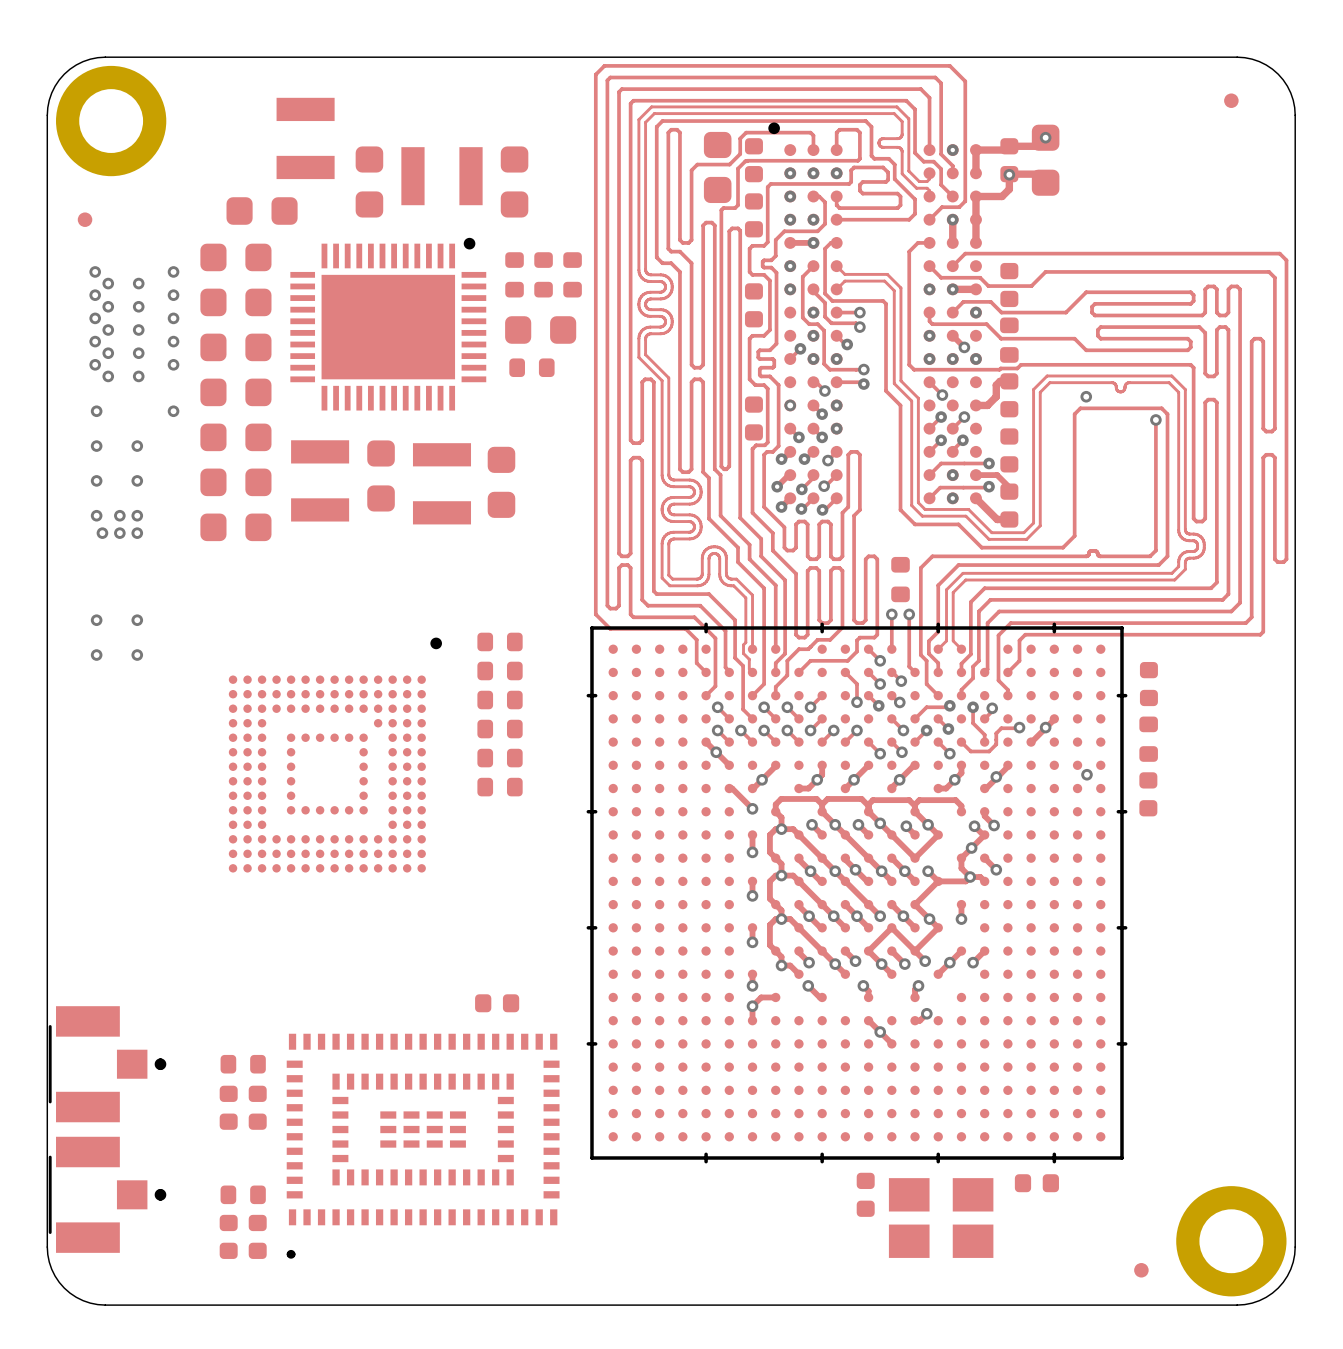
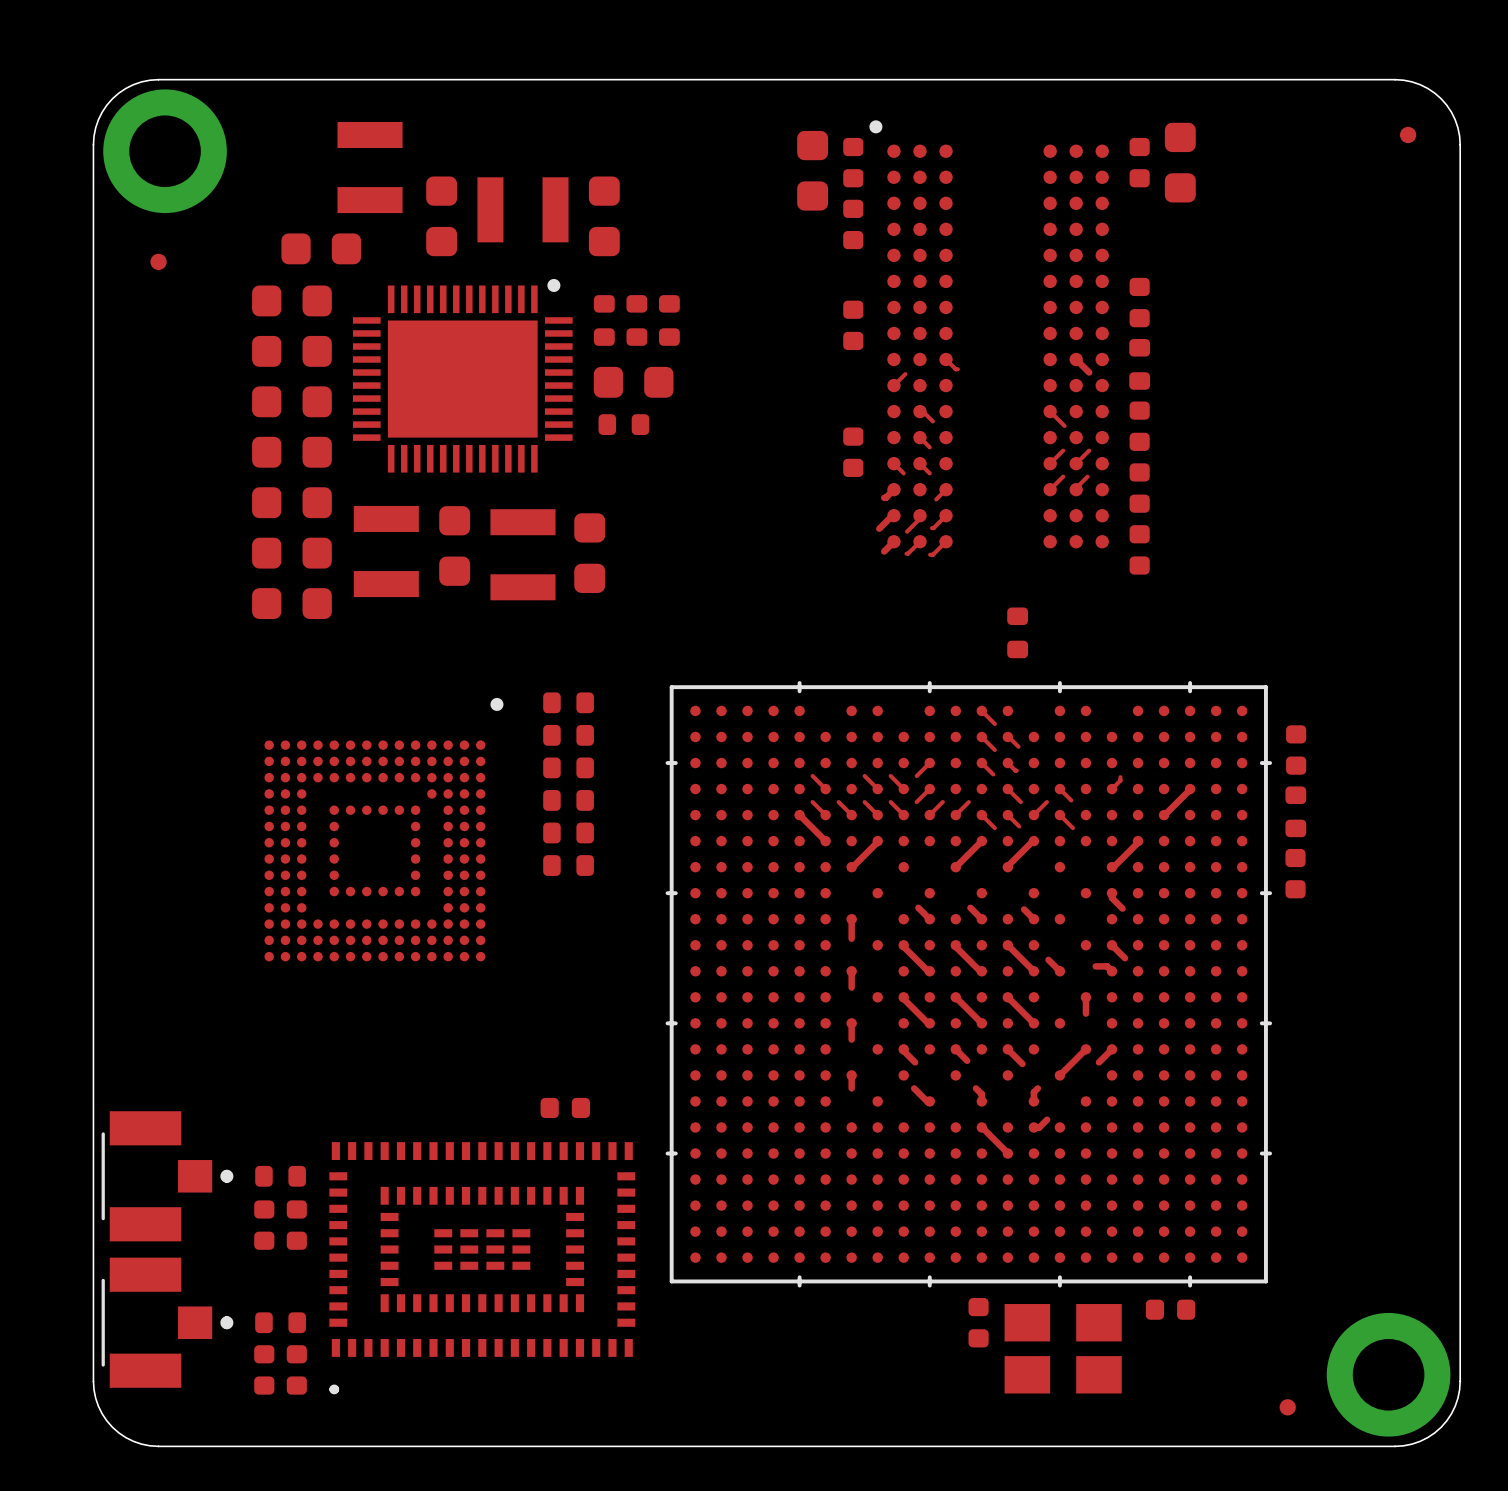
part position: (1231, 100) -> (1408, 134)
part position: (111, 121) -> (165, 151)
track: (1045, 137) (1037, 146) (1009, 146) (1005, 150) (975, 150) (975, 173) -> none
via: (1045, 137) -> none
part position: (305, 138) -> (370, 167)
board edge: (1295, 144) (1294, 107) (1287, 86) (1278, 74) (1266, 64) (1252, 59) (1237, 57) (105, 57) (83, 61) (64, 74) (51, 93) (47, 115) (47, 1247) (49, 1262) (55, 1276) (64, 1288) (76, 1297) (97, 1304) (134, 1305) -> (1460, 144) (1455, 119) (1441, 98) (1420, 84) (1395, 79) (158, 79) (133, 84) (112, 98) (98, 119) (93, 144) (93, 1381) (98, 1406) (112, 1427) (133, 1441) (158, 1446)
track: (813, 150) (813, 135) (810, 132) (746, 132) (740, 138) (740, 154) (729, 164) (697, 164) (691, 170) (691, 240) (688, 242) (682, 242) (679, 240) (679, 132) (677, 129) (671, 129) (668, 132) (668, 248) (671, 251) (679, 251) (691, 263) (691, 364) (694, 367) (700, 367) (703, 364) (703, 225) (706, 222) (711, 222) (714, 225) (714, 469) (720, 475) (720, 515) (749, 544) (749, 559) (775, 585) (775, 649) -> none
track: (836, 150) (836, 132) (839, 129) (856, 129) (859, 132) (859, 158) (857, 160) (745, 161) (738, 168) (738, 205) (735, 208) (723, 208) (721, 210) (721, 466) (726, 469) (729, 466) (729, 231) (732, 228) (738, 228) (740, 230) (740, 517) (761, 538) (761, 556) (785, 580) (785, 653) (775, 663) (775, 672) -> none
track: (929, 150) (929, 97) (920, 89) (621, 89) (619, 92) (619, 553) (621, 556) (627, 556) (630, 553) (630, 460) (633, 457) (639, 457) (642, 460) (642, 599) (648, 605) (700, 605) (725, 630) (725, 667) (729, 672) -> none
via: (952, 150) -> none
via: (790, 173) -> none
via: (813, 173) -> none
via: (836, 173) -> none
track: (929, 173) (929, 179) (927, 181) (919, 181) (908, 171) (908, 118) (896, 106) (651, 106) (638, 119) (639, 272) (645, 280) (661, 281) (665, 286) (662, 291) (647, 292) (640, 298) (639, 307) (643, 313) (662, 316) (665, 321) (662, 326) (647, 327) (641, 331) (638, 338) (638, 357) (662, 380) (663, 480) (670, 486) (691, 487) (694, 492) (691, 496) (670, 497) (663, 503) (662, 512) (666, 519) (673, 521) (690, 521) (694, 526) (690, 532) (670, 532) (664, 536) (662, 543) (662, 578) (669, 585) (702, 584) (708, 576) (709, 556) (713, 553) (718, 555) (720, 576) (722, 581) (726, 584) (733, 585) (745, 597) (745, 642) (743, 644) (743, 653) (749, 659) (749, 669) (752, 672) -> none
track: (952, 173) (952, 165) (941, 154) (941, 83) (935, 77) (610, 77) (607, 80) (607, 605) (610, 608) (616, 608) (619, 605) (619, 567) (621, 565) (627, 565) (630, 567) (630, 614) (633, 617) (694, 617) (715, 638) (715, 686) (706, 695) -> none
via: (1009, 174) -> none
part position: (441, 176) -> (522, 209)
part position: (369, 181) -> (441, 216)
part position: (514, 181) -> (604, 216)
track: (1045, 182) (1037, 174) (1009, 174) (1009, 189) (1002, 196) (975, 196) (975, 242) -> none
via: (790, 196) -> none
track: (813, 196) (819, 196) (825, 202) (825, 223) (817, 231) (784, 231) (775, 240) (775, 255) (771, 260) (762, 261) (764, 267) (771, 267) (776, 272) (776, 343) (769, 350) (758, 351) (759, 359) (774, 360) (772, 367) (761, 367) (759, 374) (769, 376) (778, 385) (778, 446) (772, 451) (767, 451) (764, 454) (764, 507) (784, 527) (784, 547) (787, 550) (793, 550) (796, 547) (796, 524) (798, 521) (804, 521) (807, 524) (807, 556) (810, 559) (816, 559) (819, 556) (819, 524) (822, 521) (827, 521) (830, 524) (830, 556) (833, 559) (839, 559) (842, 556) (842, 512) (848, 507) (848, 454) (851, 451) (856, 451) (859, 454) (859, 509) (854, 515) (854, 620) (856, 623) (862, 623) (865, 620) (865, 559) (868, 556) (874, 556) (877, 559) (877, 634) (874, 637) (859, 637) (856, 640) (856, 651) (847, 660) (810, 660) (798, 672) -> none
track: (836, 196) (836, 205) (839, 208) (897, 208) (900, 205) (900, 196) (897, 193) (862, 193) (859, 190) (859, 184) (862, 181) (886, 181) (888, 179) (888, 172) (883, 167) (854, 167) (851, 170) (851, 181) (849, 183) (770, 183) (767, 187) (767, 242) (764, 245) (752, 245) (749, 248) (749, 271) (752, 274) (764, 274) (769, 280) (769, 329) (764, 335) (752, 335) (749, 338) (749, 379) (755, 385) (764, 385) (767, 388) (767, 442) (764, 445) (756, 445) (752, 448) (752, 512) (772, 533) (772, 550) (796, 573) (796, 634) (798, 637) (804, 637) (807, 634) (807, 570) (810, 567) (816, 567) (819, 570) (819, 620) (822, 623) (827, 623) (830, 620) (830, 570) (833, 567) (839, 567) (842, 570) (842, 627) (830, 639) (817, 639) (808, 649) (798, 649) (787, 660) (787, 675) (775, 686) (775, 695) -> none
track: (929, 196) (929, 190) (927, 188) (916, 188) (902, 173) (901, 148) (882, 147) (879, 144) (881, 139) (898, 138) (901, 136) (902, 121) (894, 113) (654, 113) (645, 122) (645, 270) (649, 274) (665, 275) (669, 279) (672, 286) (671, 292) (665, 297) (649, 299) (646, 301) (646, 306) (648, 309) (667, 312) (672, 322) (669, 329) (665, 332) (646, 335) (645, 354) (668, 377) (669, 476) (672, 479) (694, 481) (698, 484) (701, 491) (700, 497) (694, 502) (672, 504) (669, 507) (669, 511) (671, 514) (692, 515) (696, 517) (701, 527) (698, 534) (694, 537) (669, 540) (668, 575) (672, 579) (699, 578) (702, 574) (702, 558) (704, 551) (713, 546) (722, 549) (726, 555) (727, 577) (736, 579) (752, 595) (752, 649) -> none
track: (952, 196) (941, 184) (941, 169) (933, 161) (923, 161) (915, 152) (915, 109) (906, 100) (633, 100) (630, 103) (630, 440) (633, 443) (639, 443) (642, 440) (642, 382) (645, 379) (650, 379) (653, 382) (653, 591) (656, 594) (708, 594) (735, 620) (735, 657) (743, 665) (743, 709) (752, 718) -> none
part: (262, 211) -> none
part position: (85, 219) -> (158, 261)
via: (790, 219) -> none
via: (813, 219) -> none
track: (836, 219) (909, 219) (915, 213) (915, 199) (894, 179) (894, 164) (888, 158) (874, 158) (871, 155) (871, 126) (865, 121) (662, 121) (656, 126) (656, 257) (662, 263) (671, 263) (679, 271) (679, 469) (682, 472) (688, 472) (691, 469) (691, 382) (694, 379) (700, 379) (703, 382) (703, 472) (708, 478) (708, 518) (738, 547) (738, 562) (764, 588) (764, 684) (752, 695) -> none
track: (929, 219) (942, 207) (959, 207) (965, 201) (965, 81) (949, 65) (604, 65) (595, 74) (595, 614) (610, 628) (685, 628) (696, 639) (696, 663) (706, 672) -> none
track: (952, 219) (952, 242) -> none
via: (952, 219) -> none
part: none -> (321, 248)
track: (790, 242) (813, 242) -> none
via: (813, 242) -> none
track: (836, 242) (830, 242) (825, 248) (825, 293) (832, 300) (883, 300) (886, 303) (886, 390) (900, 405) (900, 509) (915, 524) (958, 524) (981, 547) (1063, 547) (1074, 536) (1074, 414) (1080, 408) (1161, 408) (1167, 414) (1167, 556) (1158, 565) (958, 565) (938, 585) (938, 631) (928, 641) (928, 653) (938, 663) (938, 672) -> none
track: (929, 242) (917, 242) (909, 251) (909, 364) (914, 369) (999, 369) (1017, 368) (1021, 364) (1190, 364) (1193, 367) (1193, 518) (1196, 521) (1202, 521) (1205, 518) (1205, 402) (1208, 399) (1213, 399) (1216, 402) (1216, 582) (1211, 588) (984, 588) (970, 602) (970, 654) (961, 663) (961, 672) -> none
part: (235, 257) -> none
via: (790, 266) -> none
track: (813, 266) (802, 276) (802, 317) (809, 324) (817, 324) (824, 330) (824, 363) (829, 369) (863, 369) -> none
track: (836, 266) (844, 274) (887, 274) (900, 287) (900, 380) (918, 398) (918, 502) (925, 509) (968, 509) (991, 532) (1023, 532) (1033, 523) (1033, 389) (1047, 375) (1171, 375) (1185, 389) (1185, 529) (1187, 533) (1196, 534) (1201, 538) (1204, 544) (1201, 554) (1196, 557) (1187, 559) (1185, 569) (1174, 580) (965, 580) (953, 592) (953, 640) (961, 649) -> none
track: (929, 266) (941, 277) (980, 277) (988, 286) (1031, 286) (1045, 271) (1269, 271) (1274, 277) (1274, 428) (1271, 431) (1266, 431) (1263, 428) (1263, 341) (1260, 338) (1254, 338) (1251, 341) (1251, 617) (1245, 623) (1010, 623) (998, 635) (998, 680) (1007, 689) (1007, 695) -> none
track: (952, 266) (965, 253) (1279, 253) (1286, 260) (1286, 559) (1283, 562) (1277, 562) (1274, 559) (1274, 457) (1271, 454) (1266, 454) (1263, 457) (1263, 631) (1260, 634) (1025, 634) (1019, 640) (1019, 660) (1007, 672) -> none
via: (95, 271) -> none
via: (173, 271) -> none
part: (514, 274) -> none
part: (543, 274) -> none
part: (572, 274) -> none
via: (108, 283) -> none
via: (138, 283) -> none
part: none -> (291, 300)
via: (790, 289) -> none
track: (813, 289) (825, 302) (825, 316) (831, 323) (856, 323) (859, 327) -> none
track: (836, 289) (844, 281) (884, 281) (894, 290) (894, 383) (911, 401) (911, 505) (922, 516) (965, 516) (989, 539) (1026, 539) (1040, 525) (1040, 392) (1049, 382) (1112, 382) (1117, 390) (1120, 391) (1124, 390) (1128, 382) (1169, 382) (1178, 392) (1178, 532) (1184, 539) (1195, 541) (1196, 549) (1182, 553) (1178, 559) (1178, 566) (1171, 573) (962, 573) (946, 589) (946, 640) (938, 649) -> none
via: (929, 289) -> none
track: (952, 289) (975, 289) -> none
via: (952, 289) -> none
via: (95, 295) -> none
via: (173, 295) -> none
part: none -> (604, 320)
part: none -> (636, 320)
part: none -> (669, 320)
part: (235, 302) -> none
via: (108, 306) -> none
via: (138, 306) -> none
via: (813, 312) -> none
track: (836, 312) (859, 312) -> none
via: (859, 312) -> none
track: (929, 312) (929, 321) (932, 324) (986, 324) (1001, 338) (1074, 338) (1086, 350) (1187, 350) (1190, 347) (1190, 341) (1187, 338) (1100, 338) (1097, 335) (1097, 329) (1100, 327) (1199, 327) (1205, 332) (1205, 373) (1208, 376) (1213, 376) (1216, 373) (1216, 329) (1219, 327) (1225, 327) (1228, 329) (1228, 594) (1222, 599) (990, 599) (978, 611) (978, 660) (973, 666) (973, 678) (961, 689) (961, 695) -> none
track: (952, 312) (963, 301) (990, 301) (1001, 312) (1065, 312) (1086, 292) (1190, 292) (1193, 295) (1193, 300) (1190, 303) (1094, 303) (1092, 306) (1092, 312) (1094, 315) (1202, 315) (1205, 312) (1205, 289) (1208, 286) (1213, 286) (1216, 289) (1216, 312) (1219, 315) (1225, 315) (1228, 312) (1228, 289) (1231, 286) (1237, 286) (1240, 289) (1240, 602) (1231, 611) (999, 611) (987, 623) (987, 669) (984, 672) -> none
via: (975, 312) -> none
via: (95, 318) -> none
via: (173, 318) -> none
part position: (388, 324) -> (462, 375)
via: (859, 327) -> none
part: none -> (291, 351)
via: (108, 329) -> none
via: (138, 329) -> none
part position: (540, 329) -> (633, 382)
via: (813, 335) -> none
via: (929, 335) -> none
via: (95, 341) -> none
via: (173, 341) -> none
via: (847, 344) -> none
part: (235, 347) -> none
via: (964, 347) -> none
via: (800, 348) -> none
via: (108, 353) -> none
via: (138, 353) -> none
via: (813, 359) -> none
via: (836, 359) -> none
via: (929, 359) -> none
via: (952, 359) -> none
via: (975, 359) -> none
via: (95, 364) -> none
via: (173, 364) -> none
part position: (531, 367) -> (623, 424)
via: (863, 369) -> none
part: none -> (291, 401)
via: (108, 376) -> none
via: (138, 376) -> none
track: (1009, 381) (1000, 381) (996, 385) (996, 396) (987, 405) (975, 405) -> none
track: (836, 382) (862, 382) (863, 384) -> none
via: (863, 384) -> none
via: (824, 390) -> none
part: (235, 392) -> none
via: (942, 395) -> none
via: (1086, 396) -> none
via: (790, 405) -> none
via: (836, 405) -> none
via: (96, 411) -> none
via: (173, 411) -> none
via: (822, 414) -> none
via: (941, 417) -> none
via: (964, 417) -> none
part: none -> (291, 452)
track: (1155, 419) (1155, 550) (1150, 556) (1100, 556) (1094, 550) (1090, 551) (1086, 556) (932, 556) (920, 567) (920, 655) (926, 660) (926, 684) (938, 695) -> none
via: (1155, 419) -> none
via: (836, 428) -> none
part: (235, 437) -> none
via: (798, 437) -> none
via: (822, 437) -> none
via: (941, 440) -> none
via: (962, 440) -> none
via: (96, 446) -> none
via: (137, 446) -> none
via: (781, 459) -> none
via: (804, 459) -> none
via: (827, 460) -> none
part: none -> (291, 502)
track: (989, 463) (941, 463) (929, 475) -> none
via: (989, 463) -> none
part position: (381, 475) -> (454, 545)
via: (952, 475) -> none
track: (975, 475) (997, 475) (1009, 487) (1009, 491) -> none
via: (96, 480) -> none
via: (137, 480) -> none
part position: (320, 480) -> (386, 551)
part: (235, 482) -> none
part position: (501, 482) -> (589, 553)
part position: (441, 483) -> (522, 554)
via: (777, 486) -> none
via: (824, 486) -> none
track: (989, 486) (940, 487) (929, 498) -> none
via: (989, 486) -> none
via: (801, 489) -> none
via: (952, 498) -> none
track: (975, 498) (997, 519) (1009, 519) -> none
via: (781, 507) -> none
part: none -> (291, 553)
via: (801, 508) -> none
via: (822, 509) -> none
via: (96, 515) -> none
via: (119, 515) -> none
via: (137, 515) -> none
part: (235, 527) -> none
via: (102, 533) -> none
via: (119, 533) -> none
via: (137, 533) -> none
part: none -> (291, 603)
track: (891, 614) (891, 649) -> none
via: (891, 614) -> none
track: (909, 614) (909, 666) (915, 672) -> none
via: (909, 614) -> none
via: (96, 620) -> none
via: (137, 620) -> none
via: (96, 655) -> none
via: (137, 655) -> none
via: (880, 660) -> none
track: (845, 672) (856, 684) (856, 702) -> none
via: (901, 681) -> none
via: (880, 684) -> none
via: (856, 702) -> none
via: (899, 702) -> none
via: (878, 705) -> none
track: (949, 705) (926, 707) (915, 718) -> none
via: (949, 705) -> none
via: (717, 707) -> none
via: (764, 707) -> none
via: (787, 707) -> none
via: (810, 707) -> none
track: (973, 707) (973, 723) (984, 734) (984, 742) -> none
via: (973, 707) -> none
via: (992, 708) -> none
track: (1019, 727) (1001, 728) (996, 733) (996, 744) (989, 751) (970, 751) (961, 742) -> none
via: (1019, 727) -> none
via: (1045, 727) -> none
via: (948, 729) -> none
via: (717, 730) -> none
via: (740, 730) -> none
via: (764, 730) -> none
via: (787, 730) -> none
via: (810, 730) -> none
via: (833, 730) -> none
via: (856, 730) -> none
via: (903, 730) -> none
via: (926, 730) -> none
via: (716, 752) -> none
via: (901, 752) -> none
via: (880, 753) -> none
via: (949, 753) -> none
track: (822, 765) (822, 774) (808, 788) (798, 788) -> none
track: (961, 765) (961, 773) (946, 788) (938, 788) -> none
via: (1086, 774) -> none
via: (996, 776) -> none
via: (762, 779) -> none
via: (817, 779) -> none
via: (854, 779) -> none
via: (899, 779) -> none
via: (954, 779) -> none
track: (729, 788) (732, 788) (752, 808) -> none
track: (822, 804) (822, 811) (891, 881) -> none
track: (822, 804) (827, 798) (861, 798) (868, 805) -> none
track: (822, 804) (816, 798) (781, 798) (775, 804) (775, 811) (781, 817) (781, 829) -> none
track: (915, 805) (909, 800) (872, 800) (868, 804) (868, 811) (915, 858) (938, 834) (915, 811) (915, 804) (919, 800) (955, 800) (961, 805) (961, 811) -> none
via: (752, 808) -> none
via: (880, 823) -> none
via: (812, 824) -> none
via: (835, 824) -> none
via: (858, 824) -> none
via: (928, 824) -> none
via: (994, 825) -> none
via: (906, 826) -> none
track: (974, 826) (984, 834) (961, 858) (961, 868) (970, 877) (965, 881) (938, 881) (915, 904) (938, 927) (915, 951) -> none
via: (974, 826) -> none
via: (781, 829) -> none
via: (971, 848) -> none
via: (752, 852) -> none
via: (855, 869) -> none
via: (996, 869) -> none
via: (810, 871) -> none
via: (835, 871) -> none
via: (881, 871) -> none
via: (904, 871) -> none
via: (928, 871) -> none
track: (781, 875) (781, 863) (769, 852) (769, 834) (775, 829) (793, 829) (880, 916) -> none
via: (781, 875) -> none
via: (970, 877) -> none
via: (752, 895) -> none
via: (809, 916) -> none
via: (833, 916) -> none
via: (856, 916) -> none
via: (880, 916) -> none
via: (903, 916) -> none
track: (781, 919) (781, 910) (769, 898) (769, 881) (775, 875) (793, 875) (845, 927) -> none
via: (781, 919) -> none
via: (929, 919) -> none
via: (961, 919) -> none
via: (752, 942) -> none
via: (855, 961) -> none
track: (925, 961) (891, 927) (868, 951) (891, 974) -> none
via: (925, 961) -> none
via: (809, 962) -> none
via: (949, 962) -> none
via: (973, 962) -> none
via: (835, 964) -> none
via: (881, 964) -> none
via: (904, 964) -> none
via: (781, 965) -> none
track: (798, 974) (790, 965) (781, 965) (781, 956) (769, 945) (769, 924) (775, 919) (790, 919) (845, 974) -> none
via: (752, 985) -> none
via: (808, 985) -> none
via: (863, 985) -> none
via: (918, 985) -> none
track: (775, 997) (761, 997) (752, 1006) (752, 1020) -> none
via: (752, 1006) -> none
via: (926, 1013) -> none
via: (880, 1032) -> none
part position: (107, 1064) -> (167, 1176)
part position: (107, 1194) -> (167, 1322)

